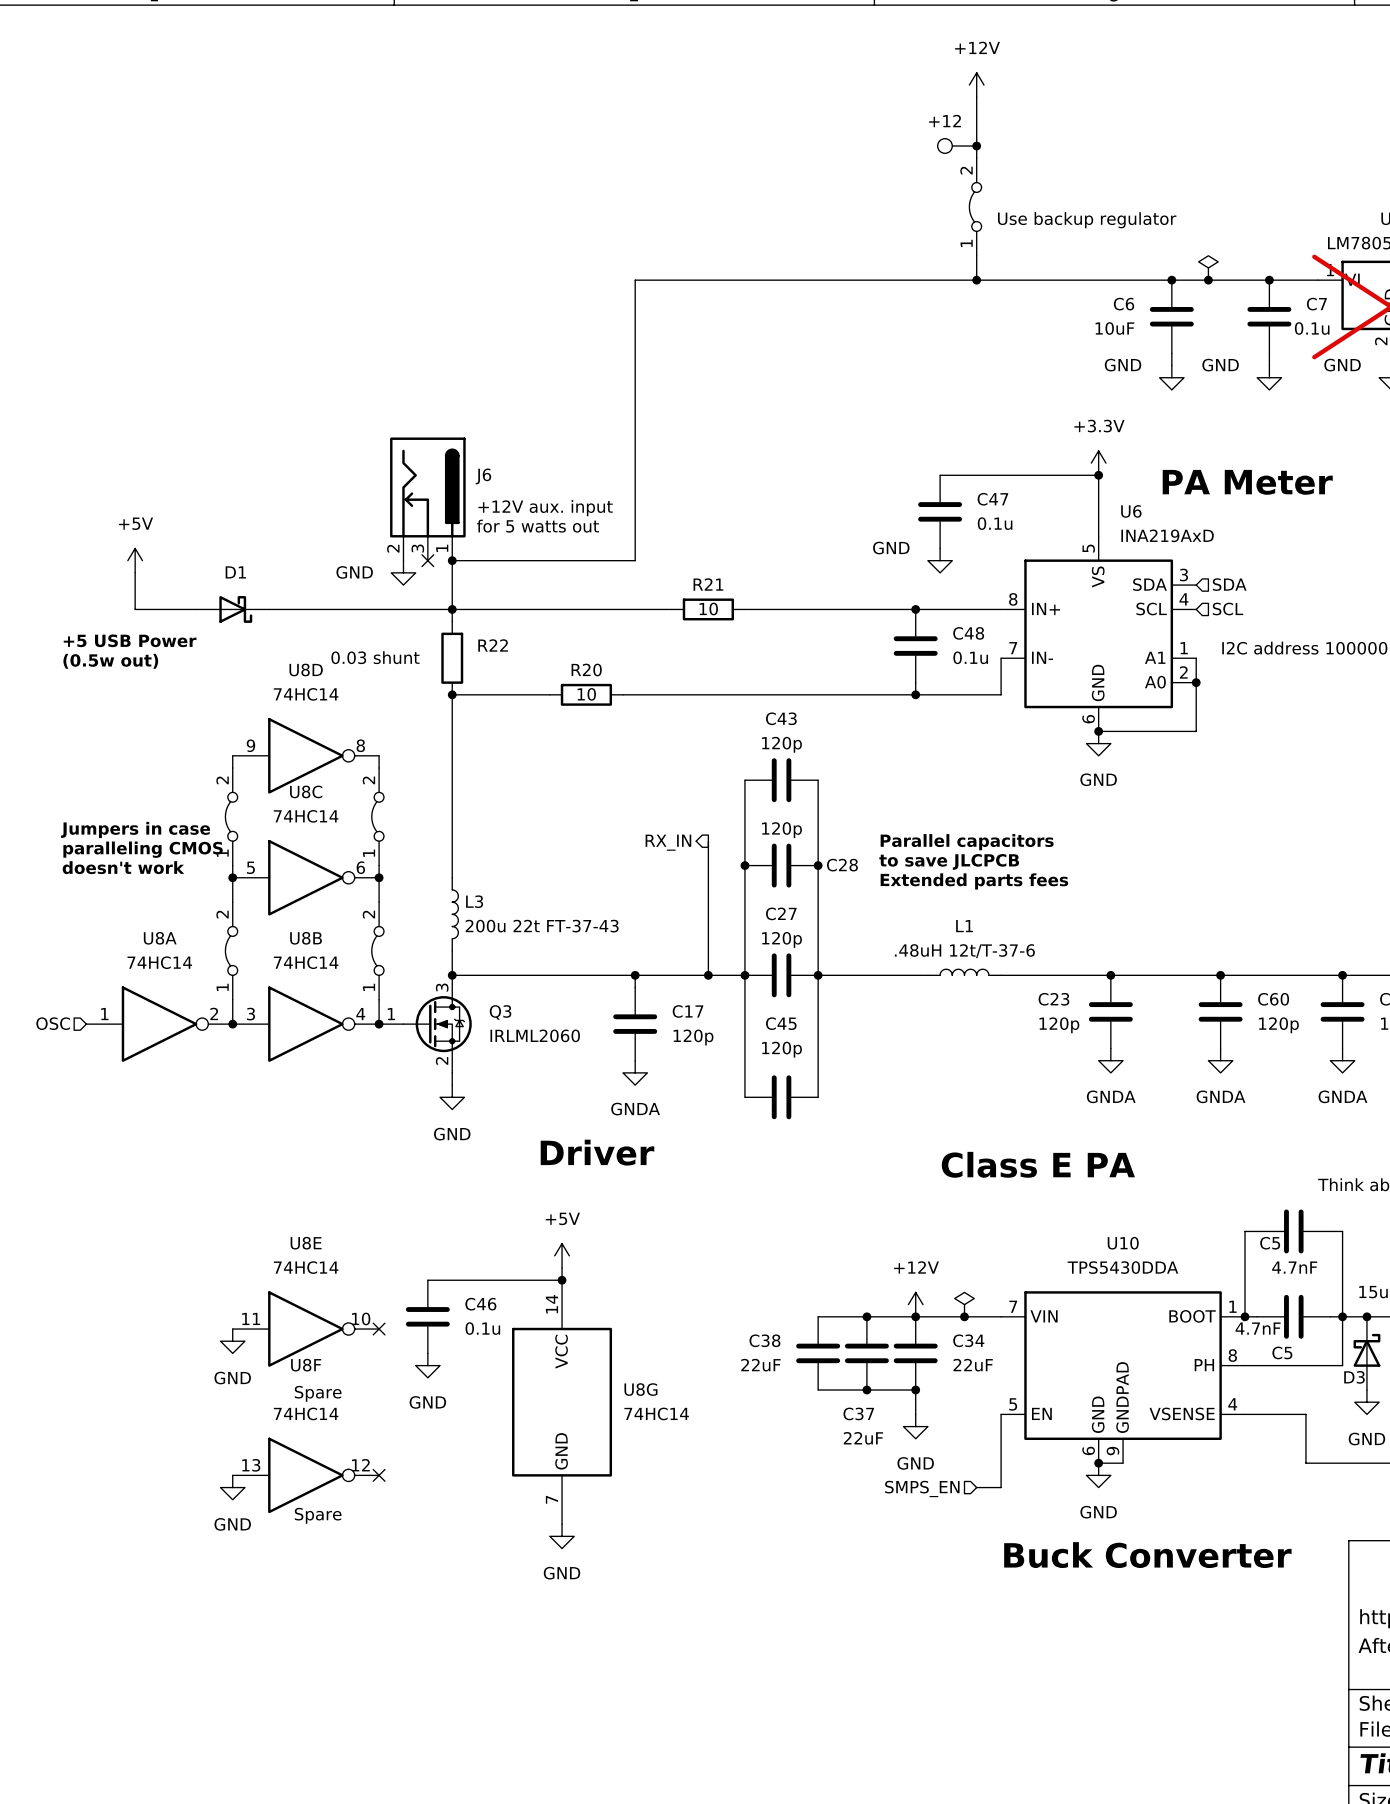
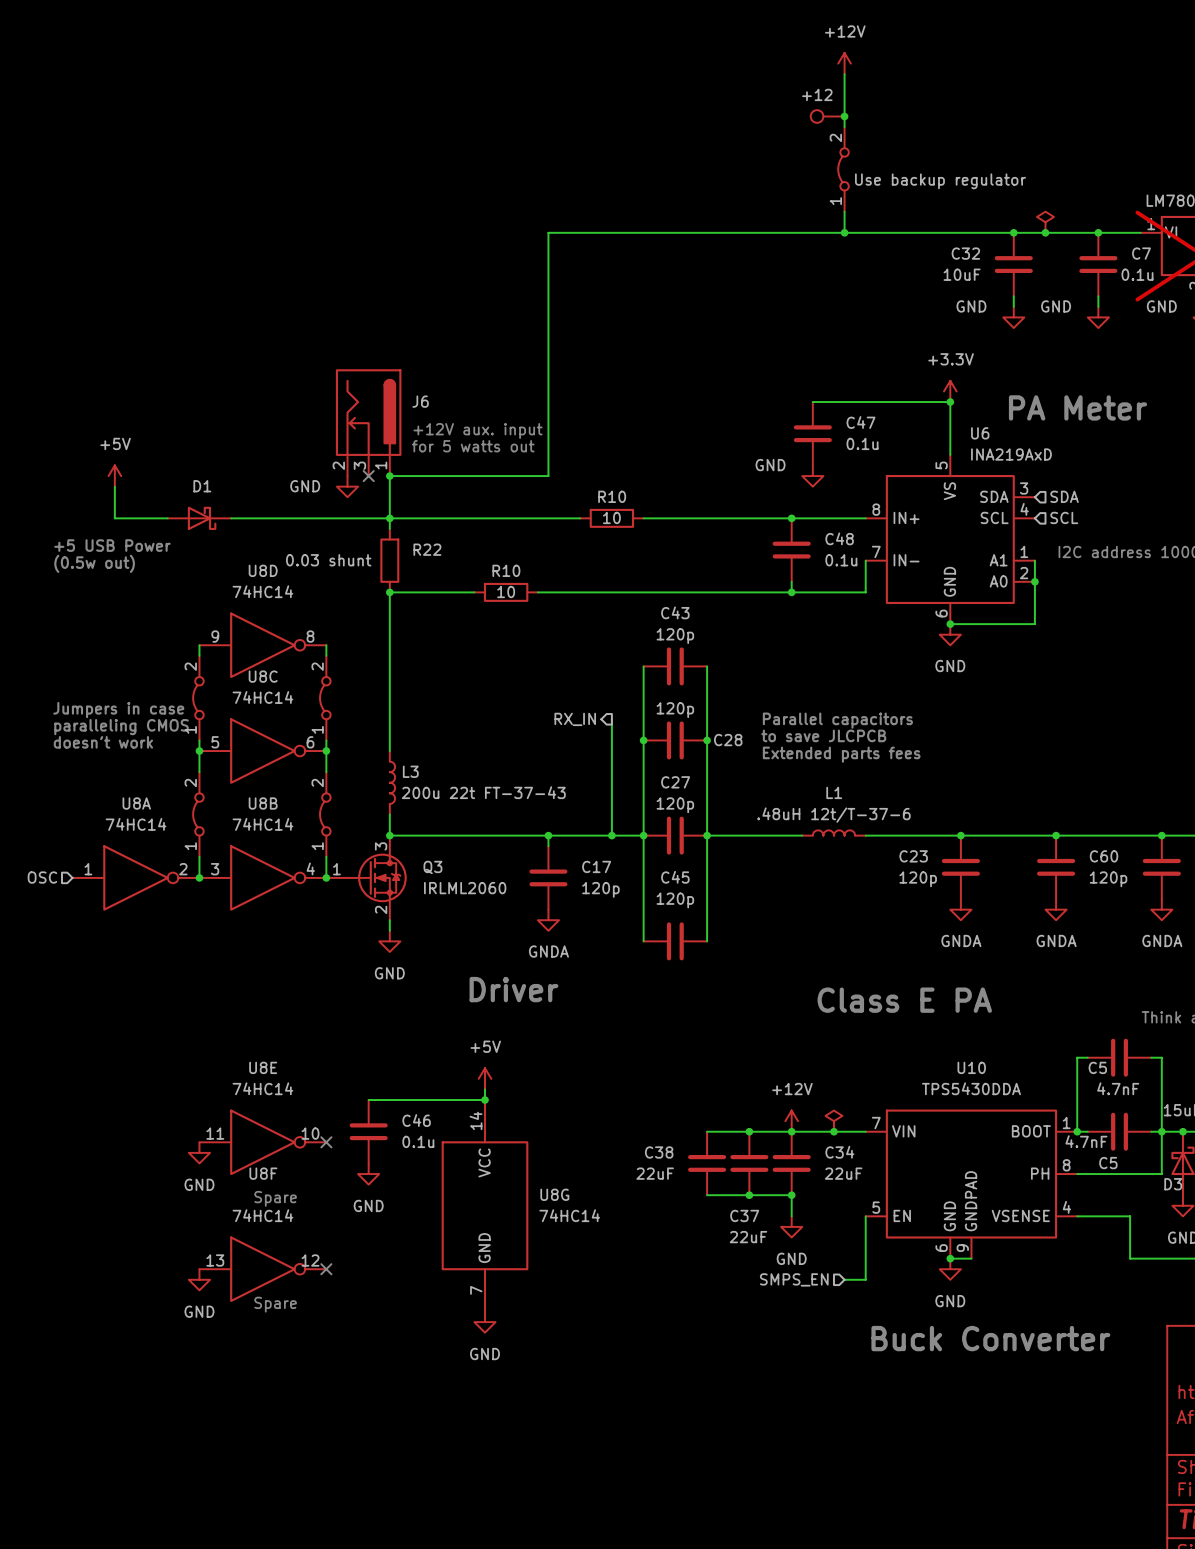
C6 name: C6 (1124, 304) -> C32 (965, 253)
R21 name: R21 (708, 584) -> R10 (612, 496)
R20 name: R20 (586, 669) -> R10 (506, 570)

